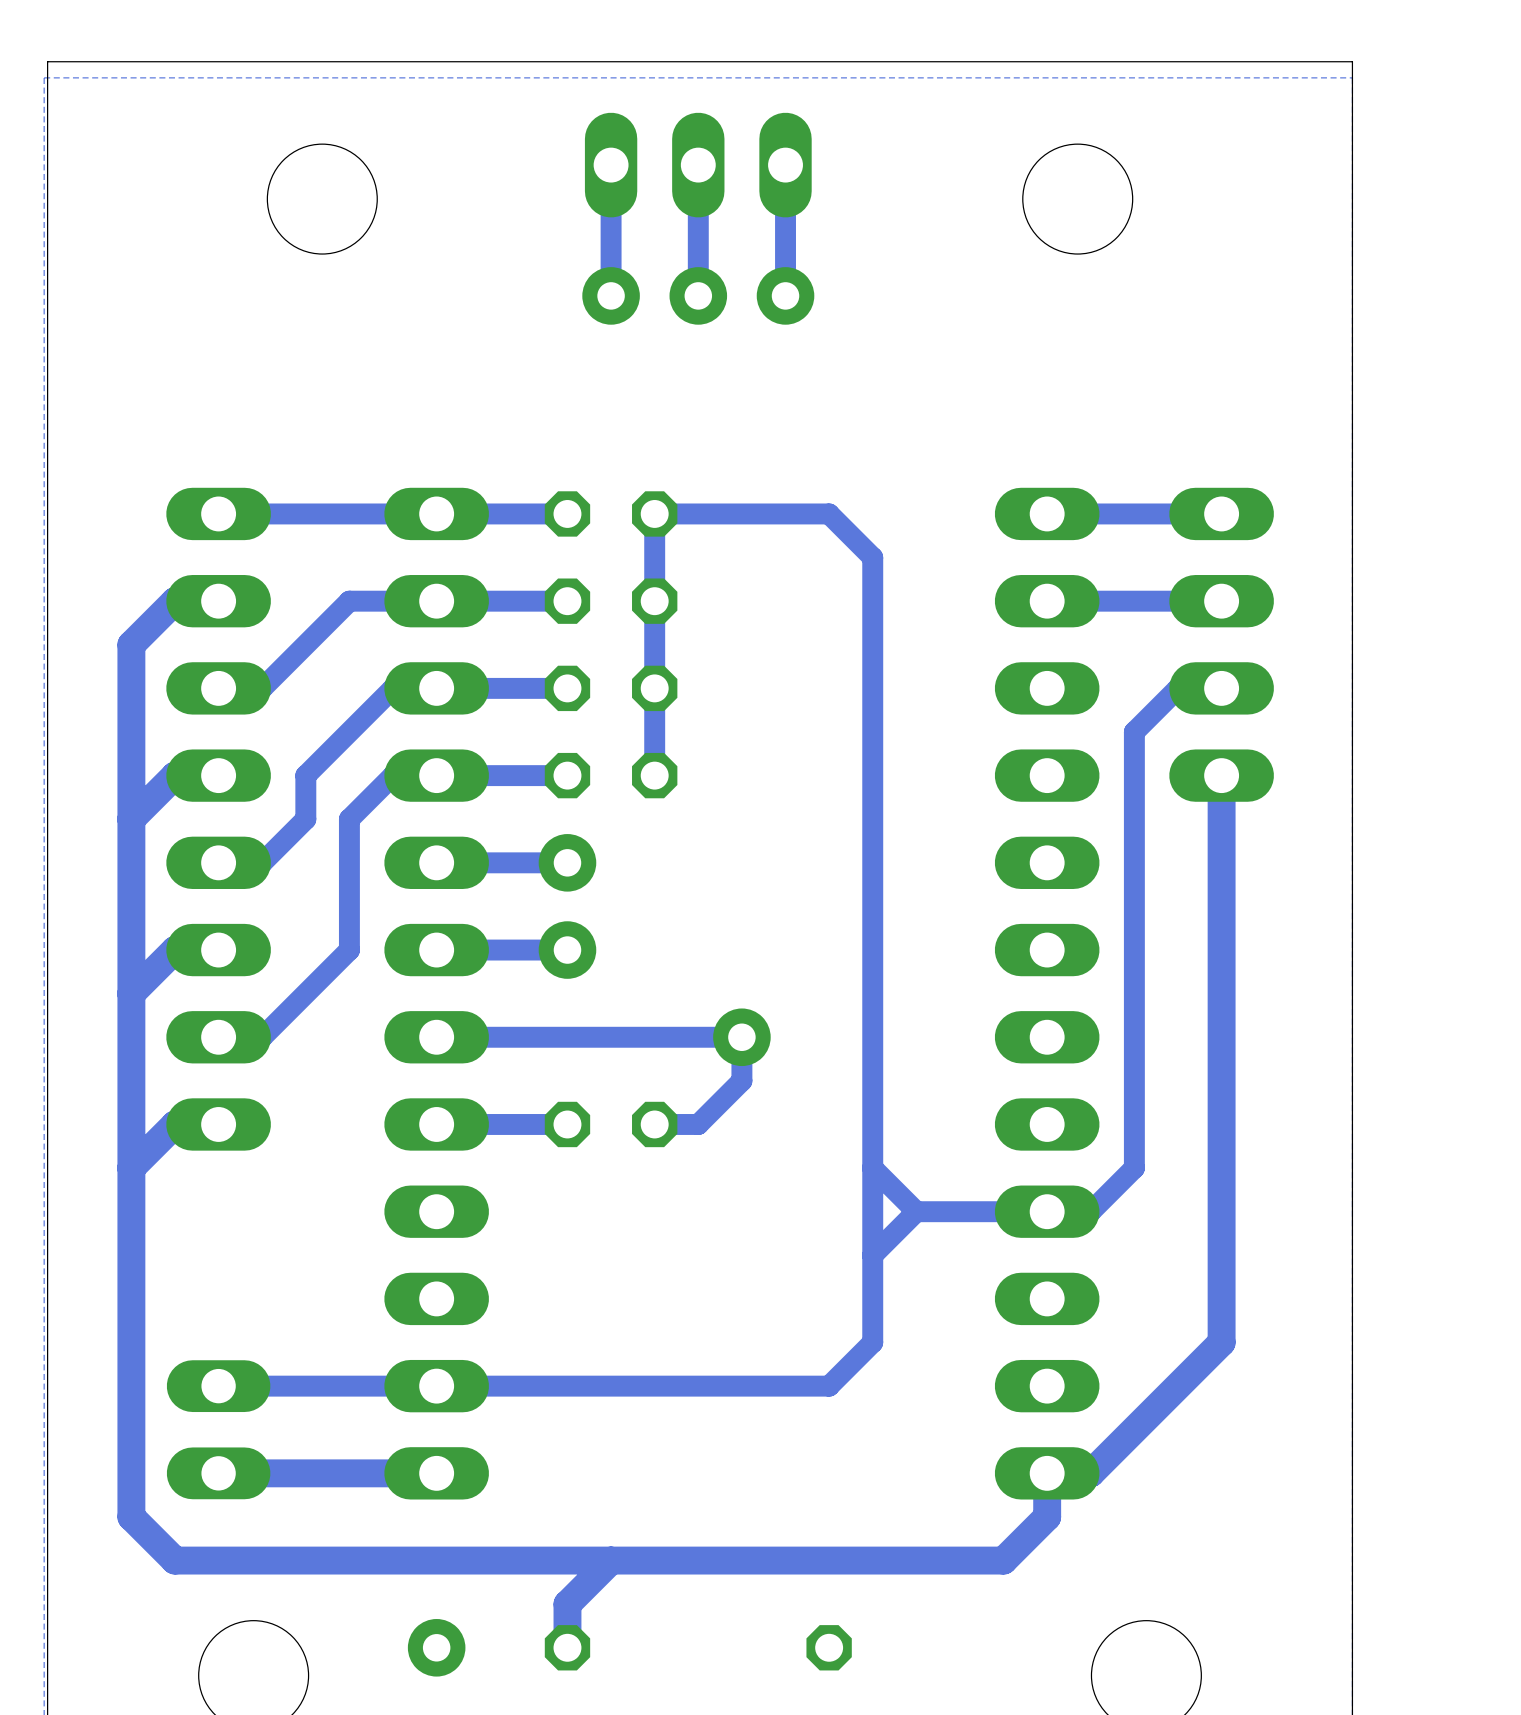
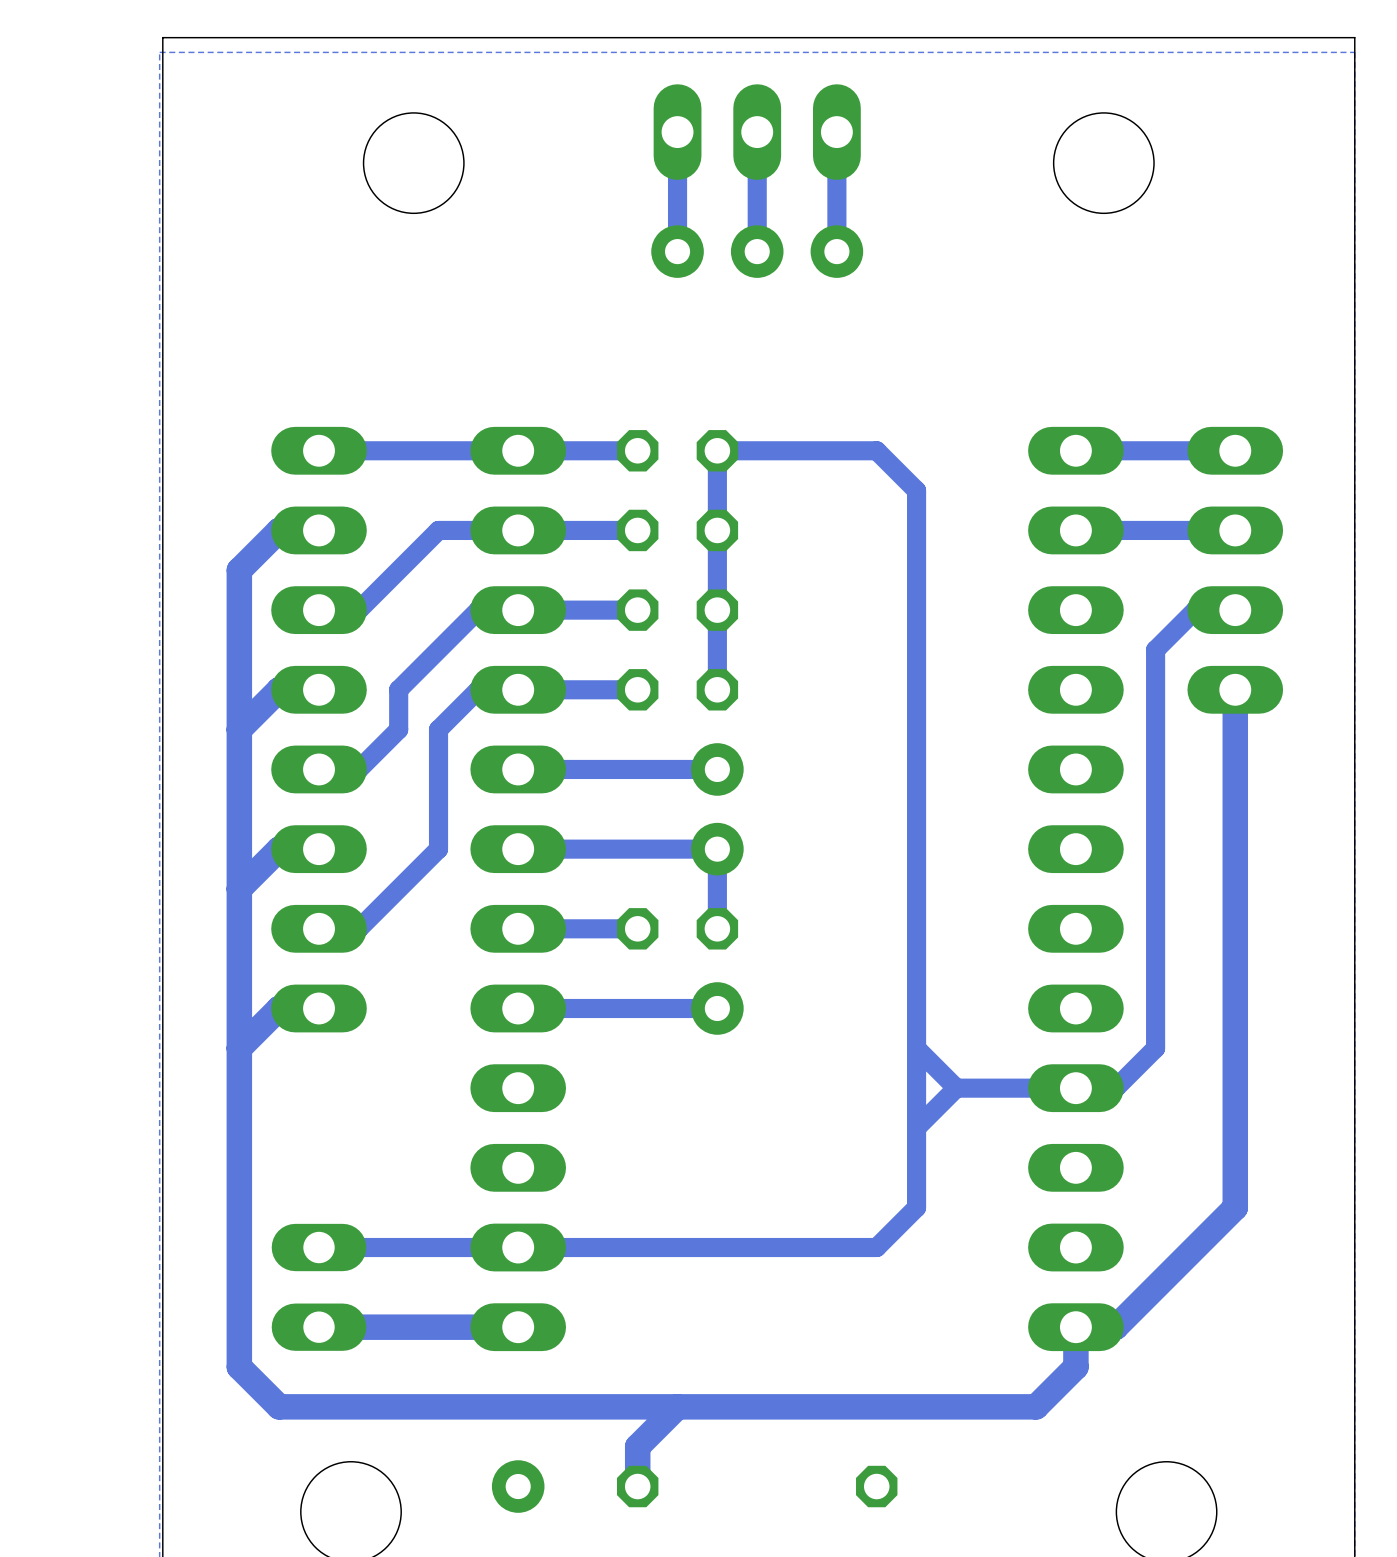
via: (567, 862) -> none
track: none -> (717, 769) (637, 769)
via: none -> (717, 769)
track: none -> (637, 849) (717, 849) (717, 928)
via: (567, 950) -> none
via: none -> (717, 849)
track: (567, 1037) (741, 1037) (741, 1080) (698, 1124) (654, 1124) -> (637, 1008) (717, 1008)
via: (741, 1037) -> none
part position: (611, 1124) -> (677, 928)
via: none -> (717, 1008)

